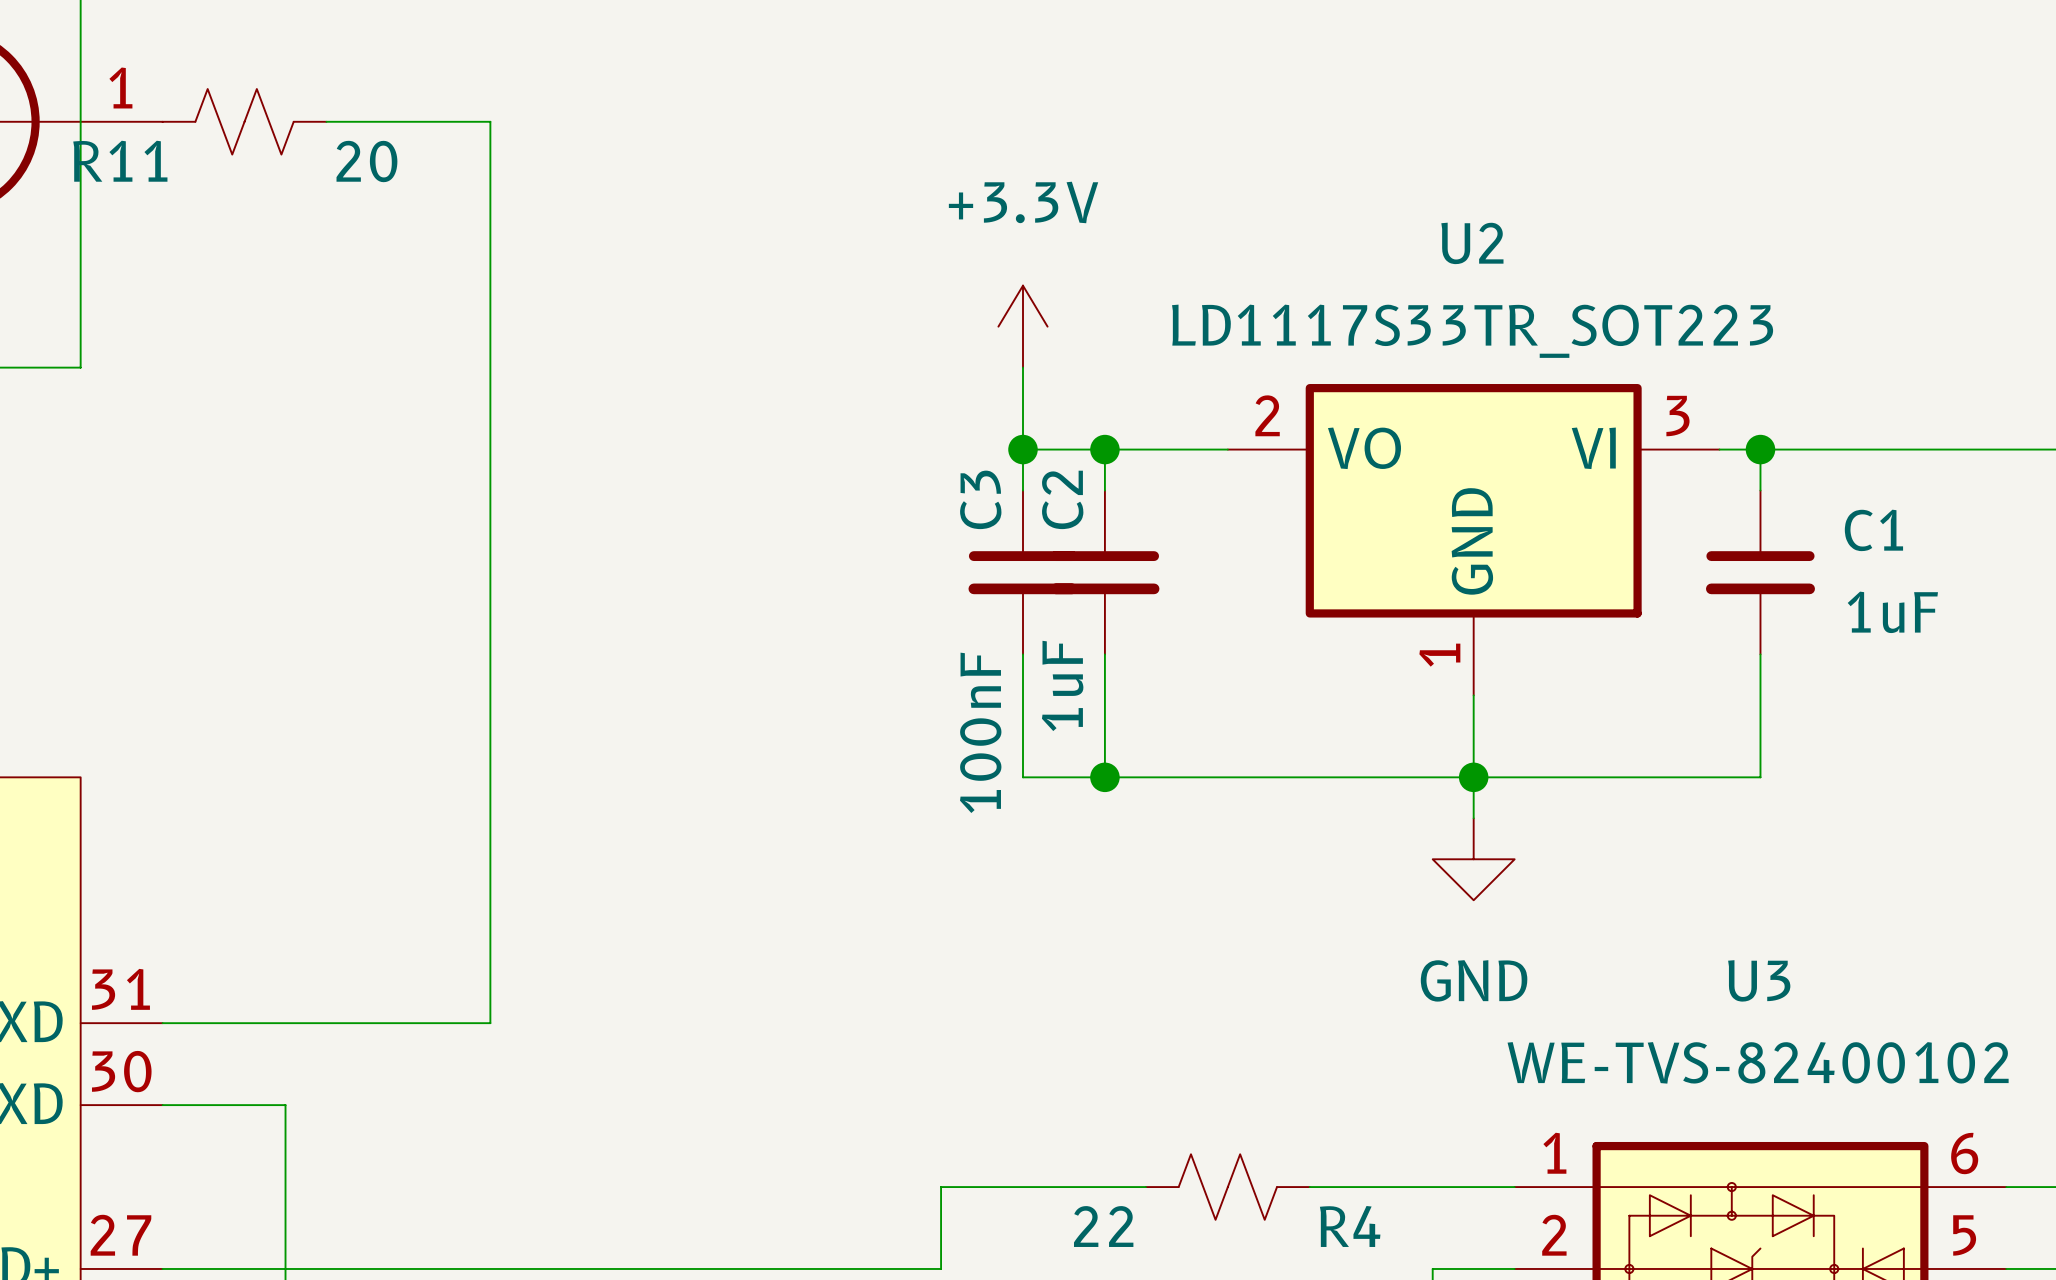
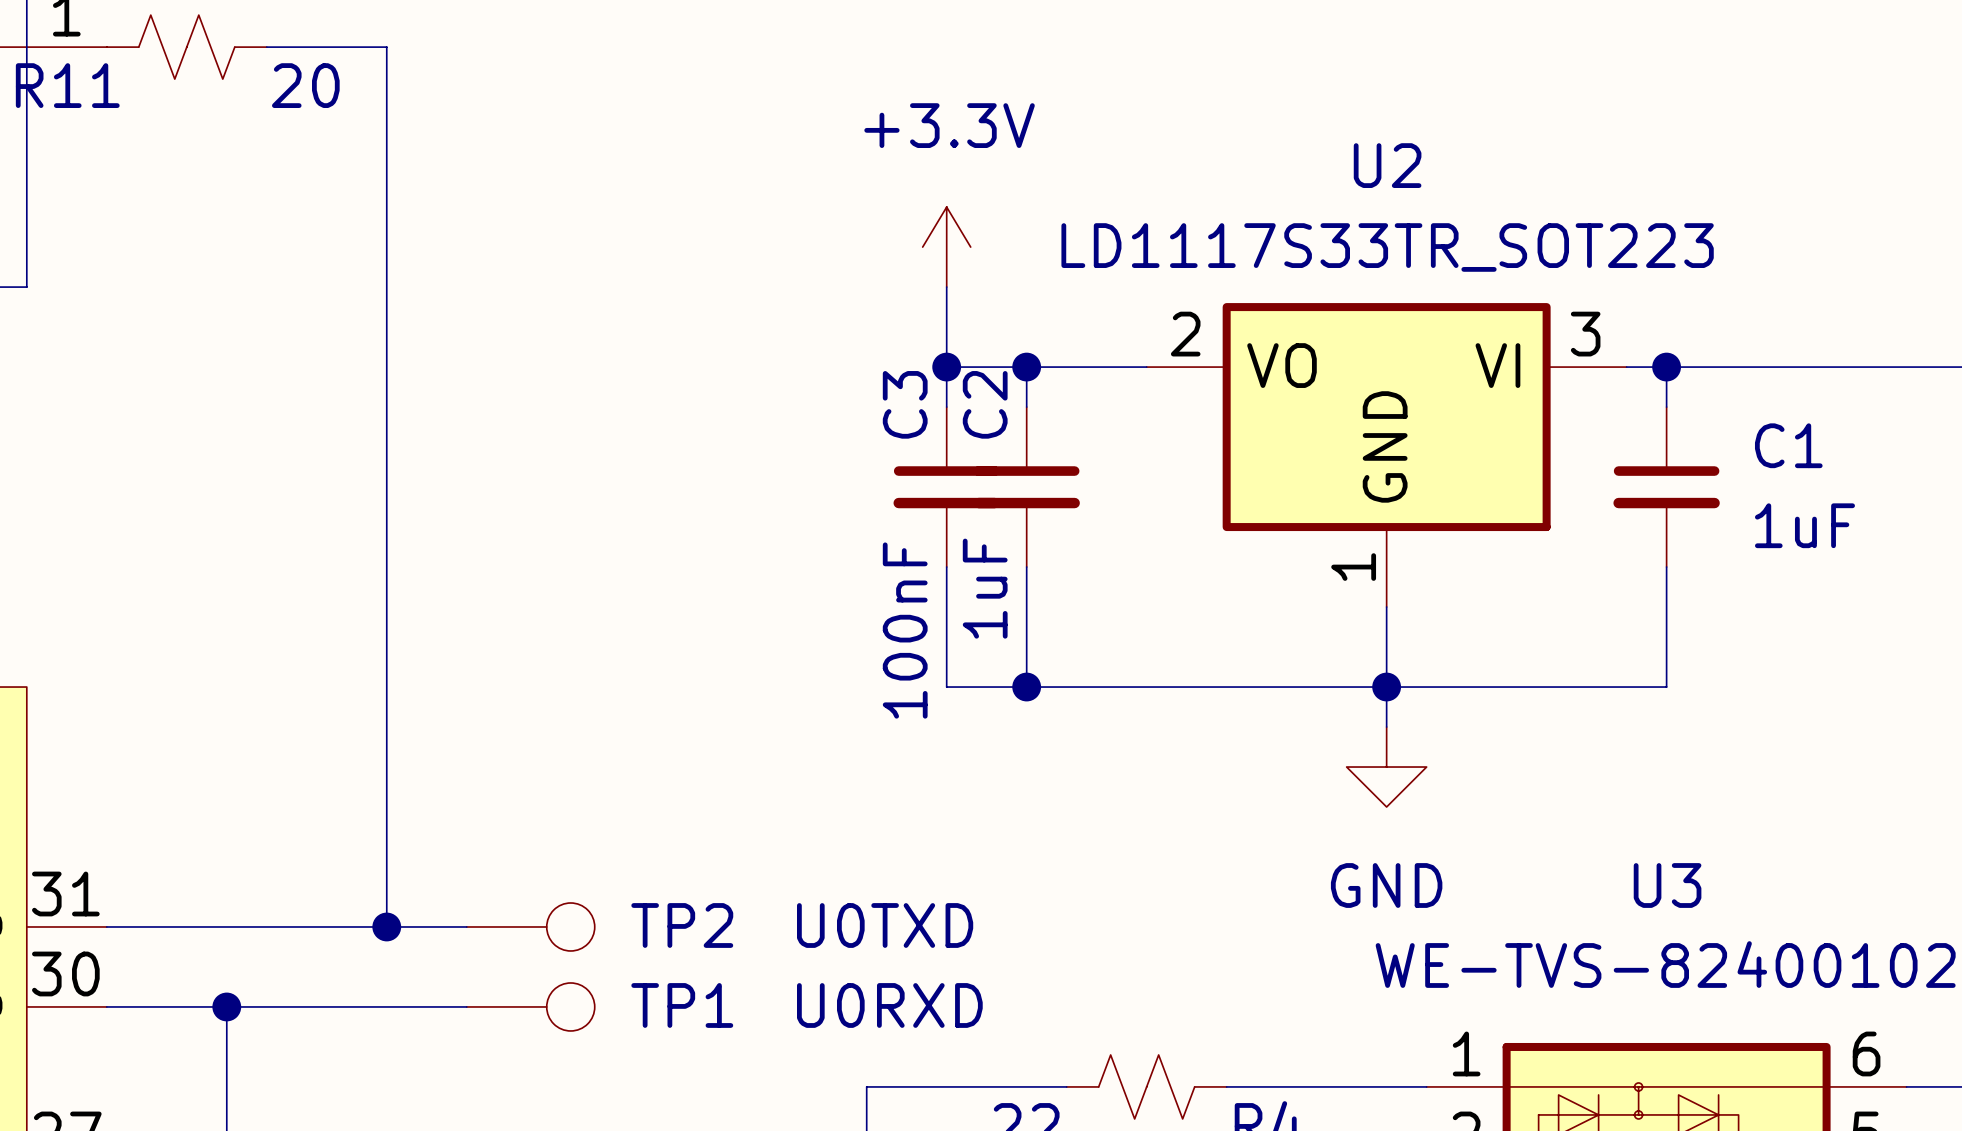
wire: (449, 121) (490, 121) (490, 1023) -> (386, 47) (386, 926)
junction: none -> (386, 926)
wire: none -> (426, 926) (466, 926)
TP2: none -> U0TXD (530, 926)
wire: none -> (226, 1006) (466, 1006)
junction: none -> (226, 1006)
TP1: none -> U0RXD (530, 1006)

